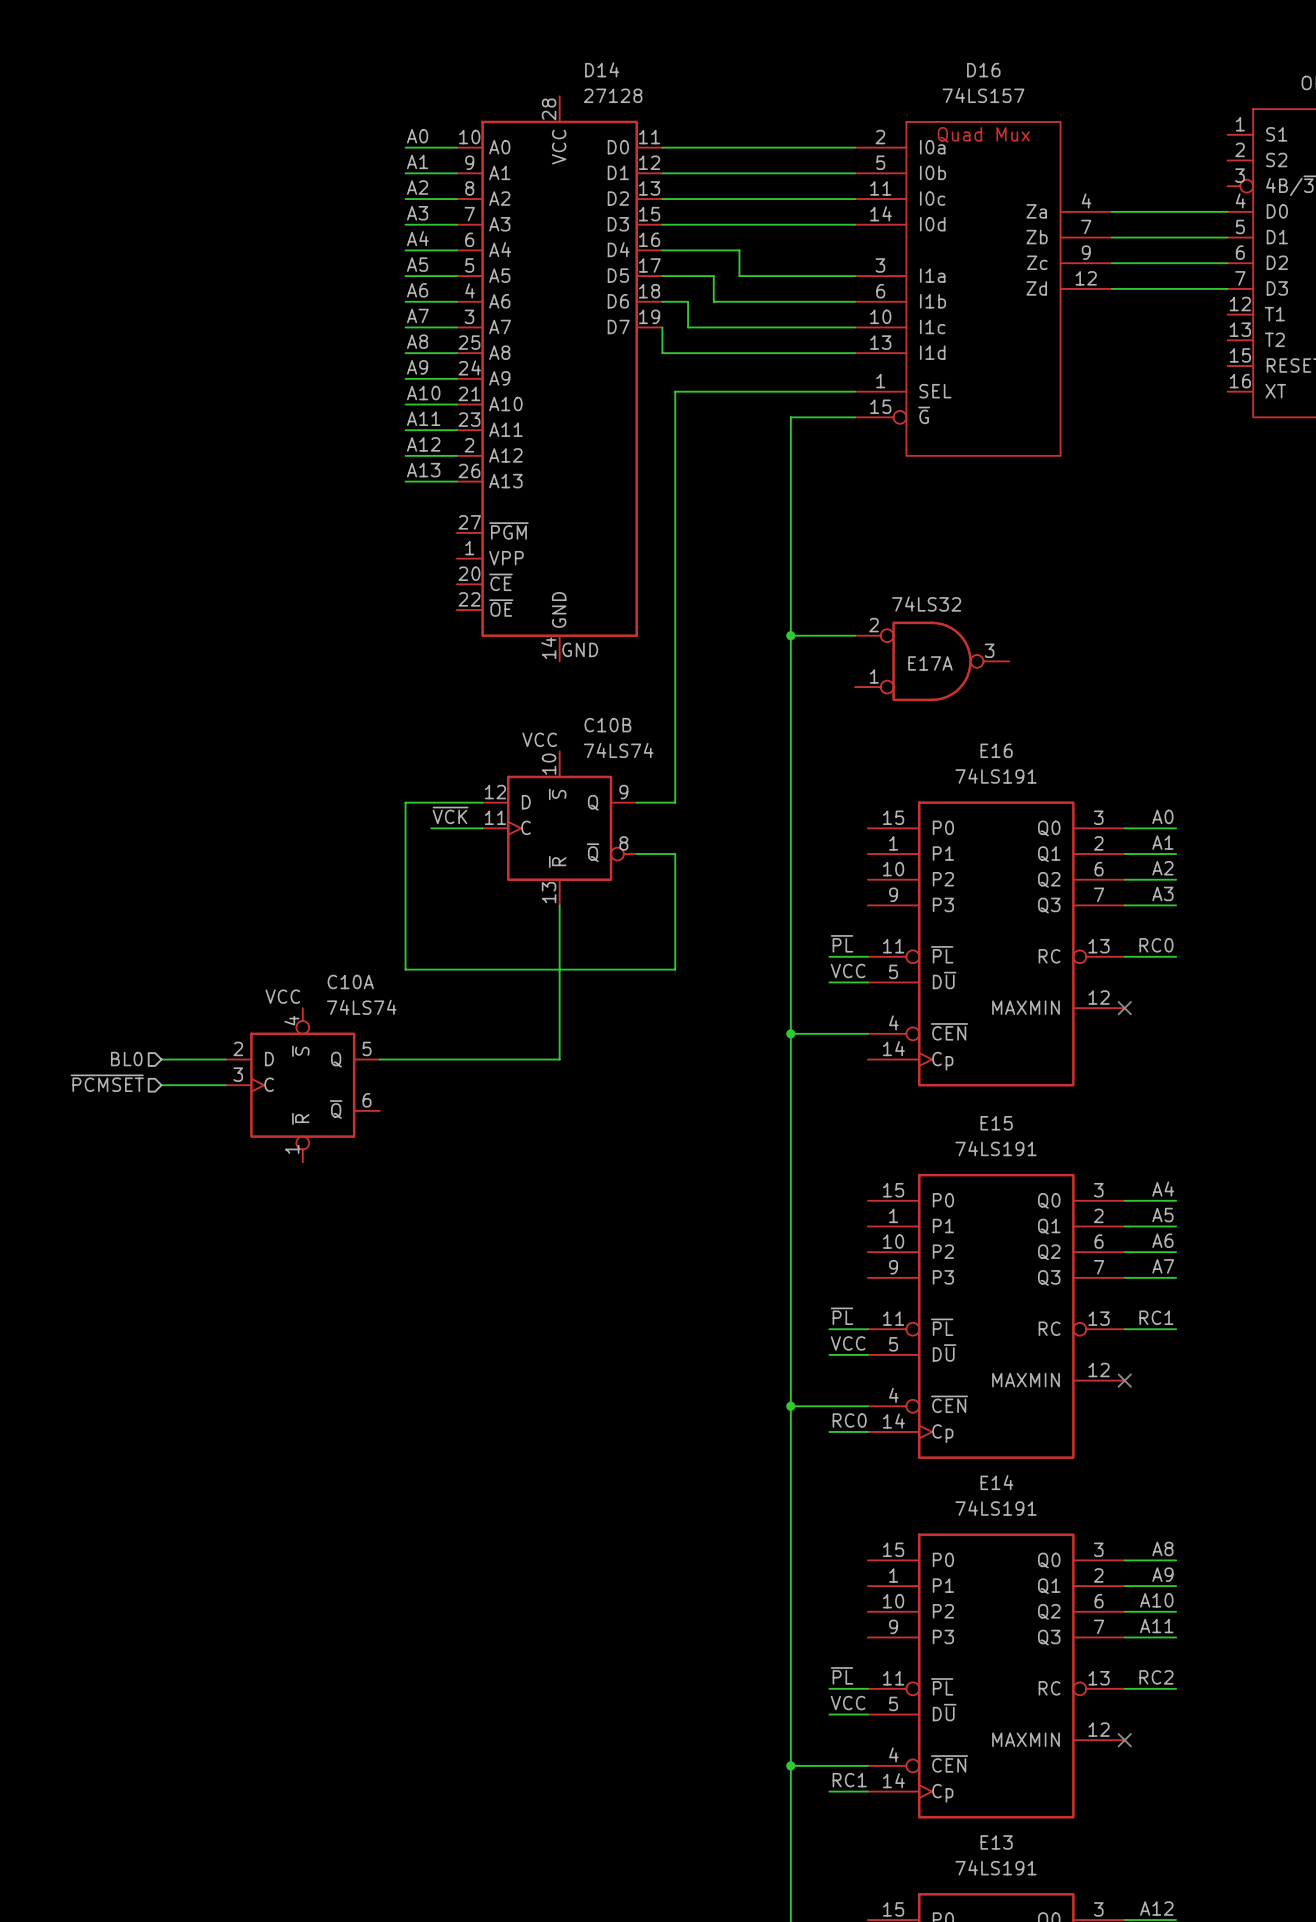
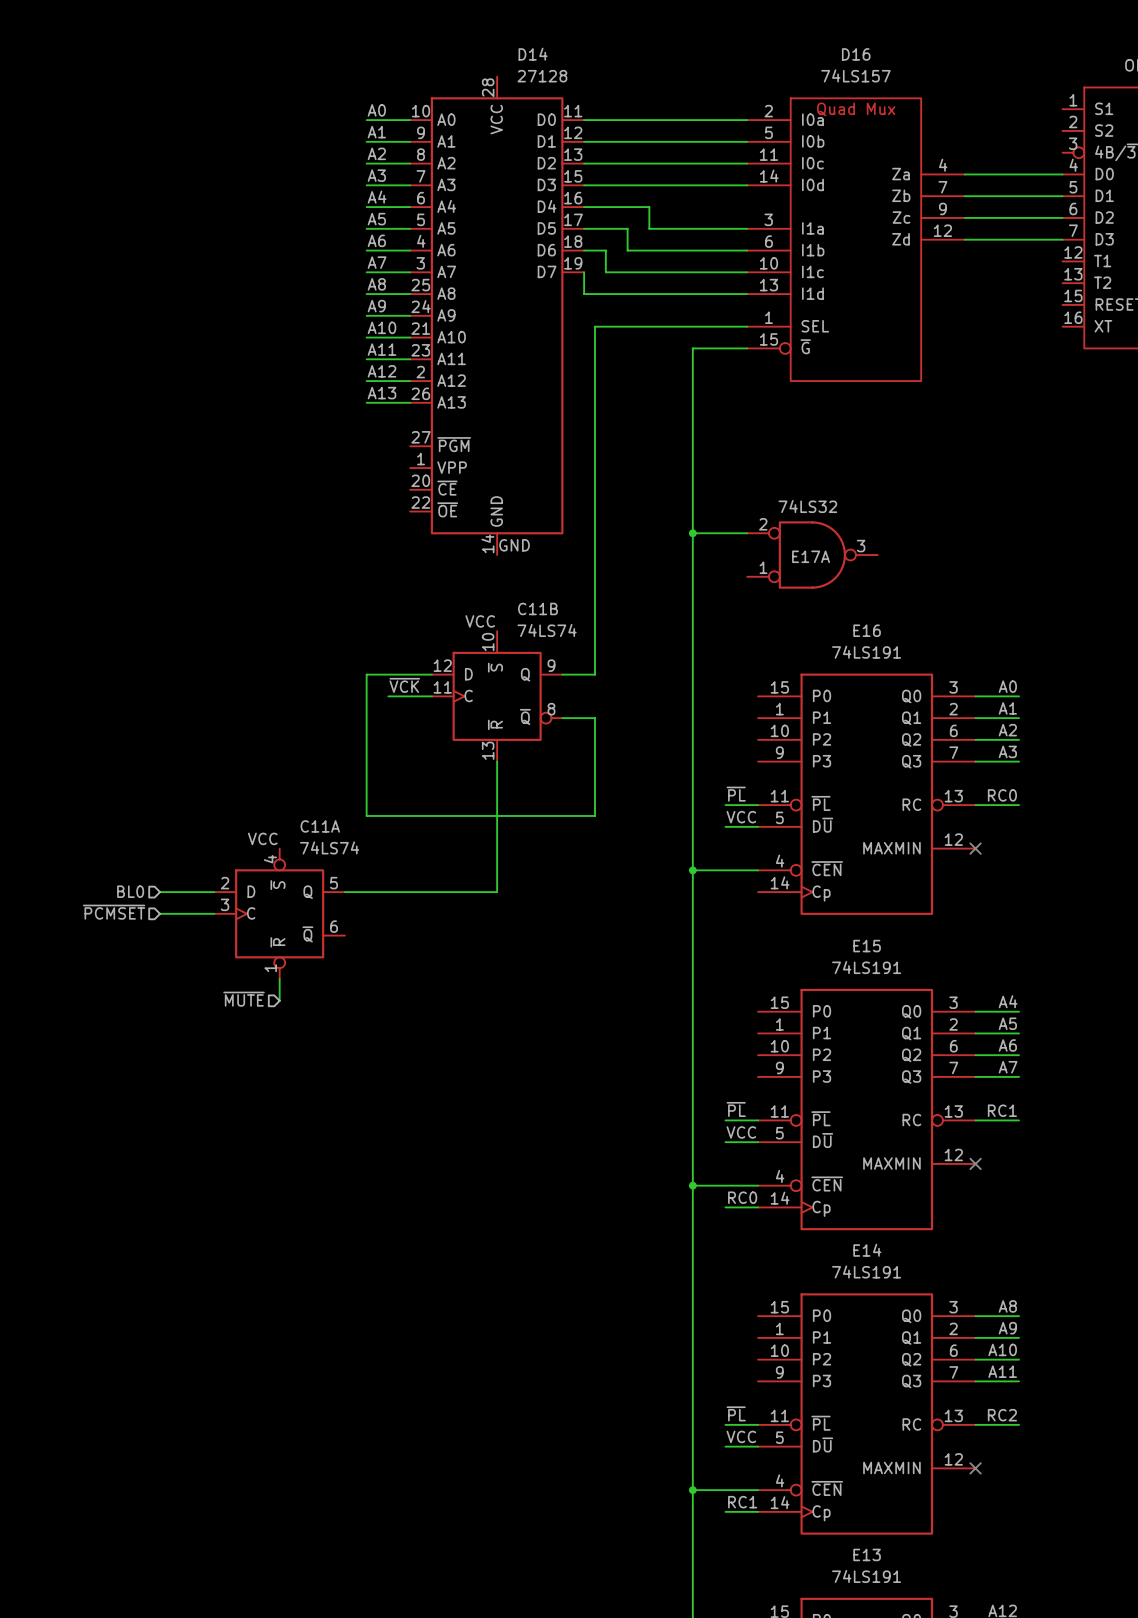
C10B name: C10B (607, 725) -> C11B (538, 608)
C10A name: C10A (350, 981) -> C11A (320, 826)
wire: none -> (279, 979) (279, 1000)
hierarchical label: none -> ~{MUTE} (244, 999)

